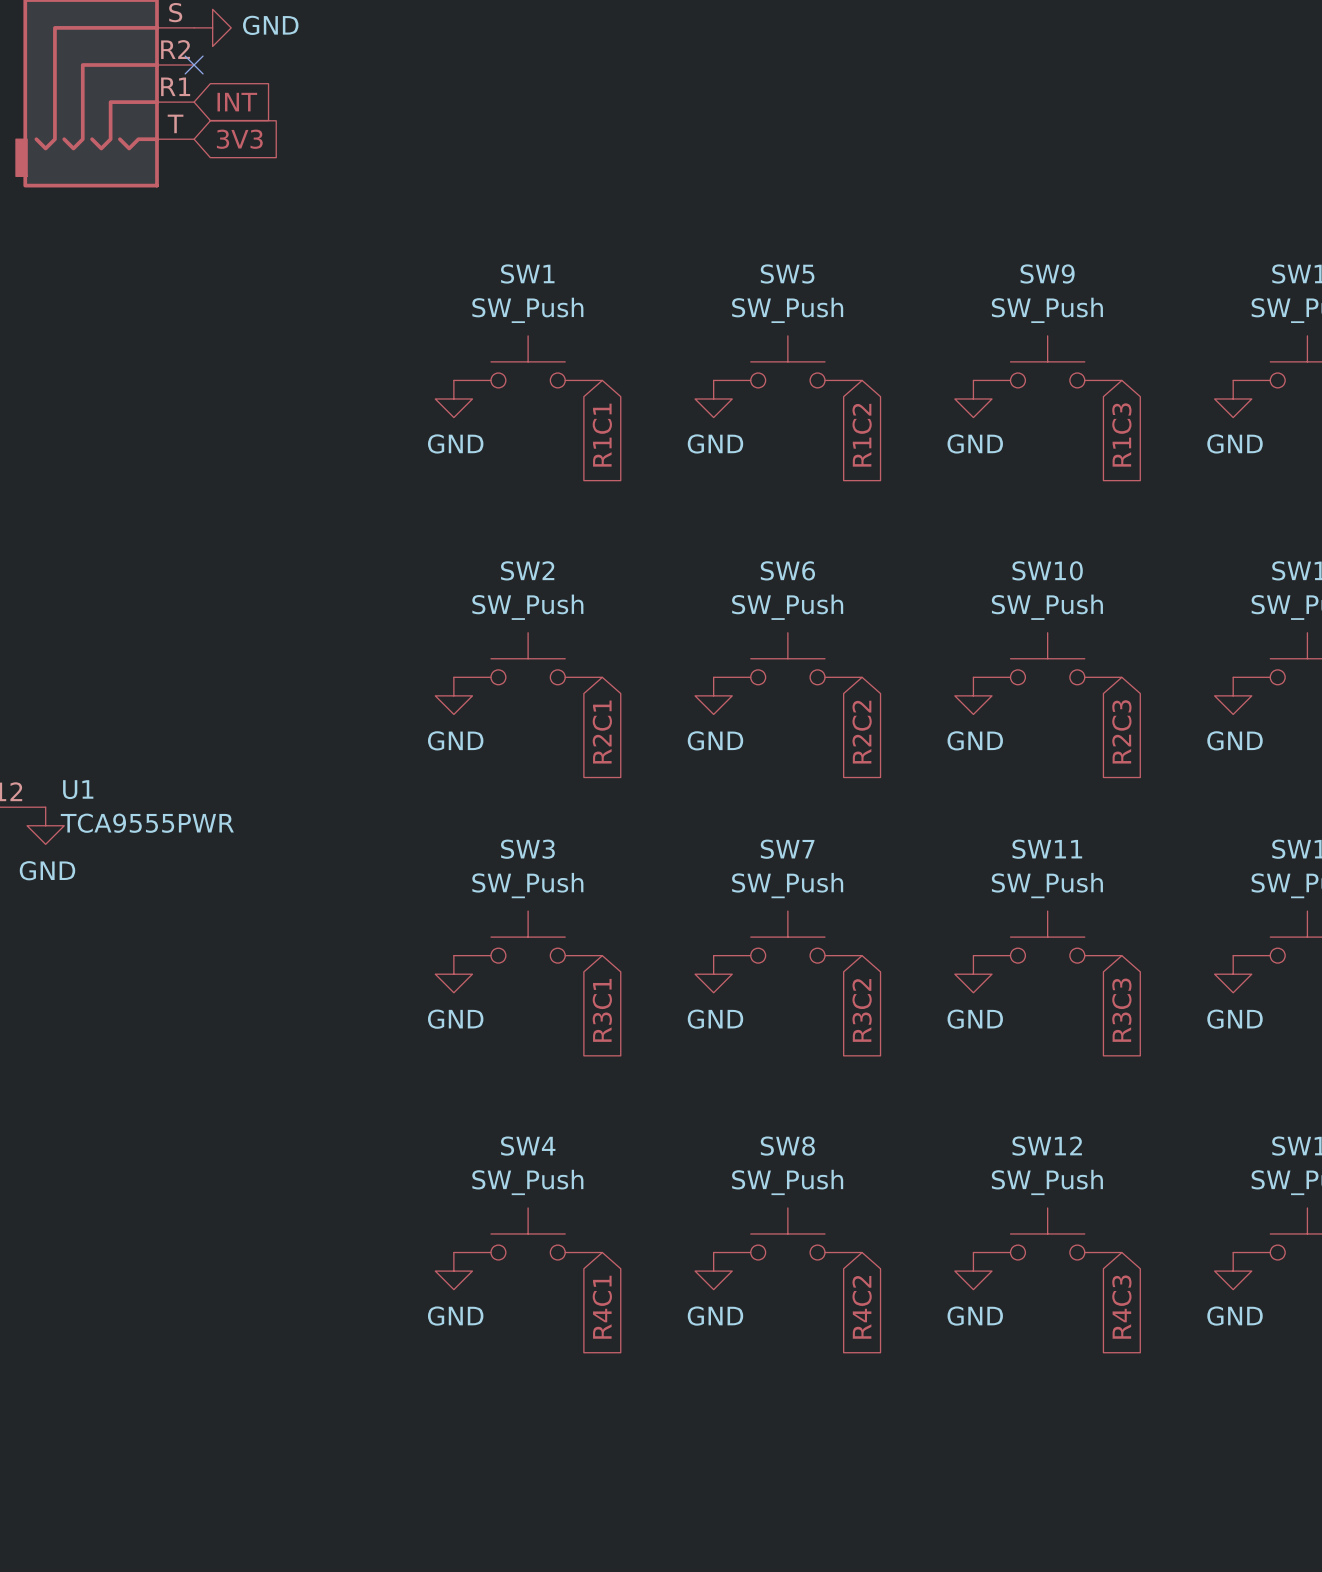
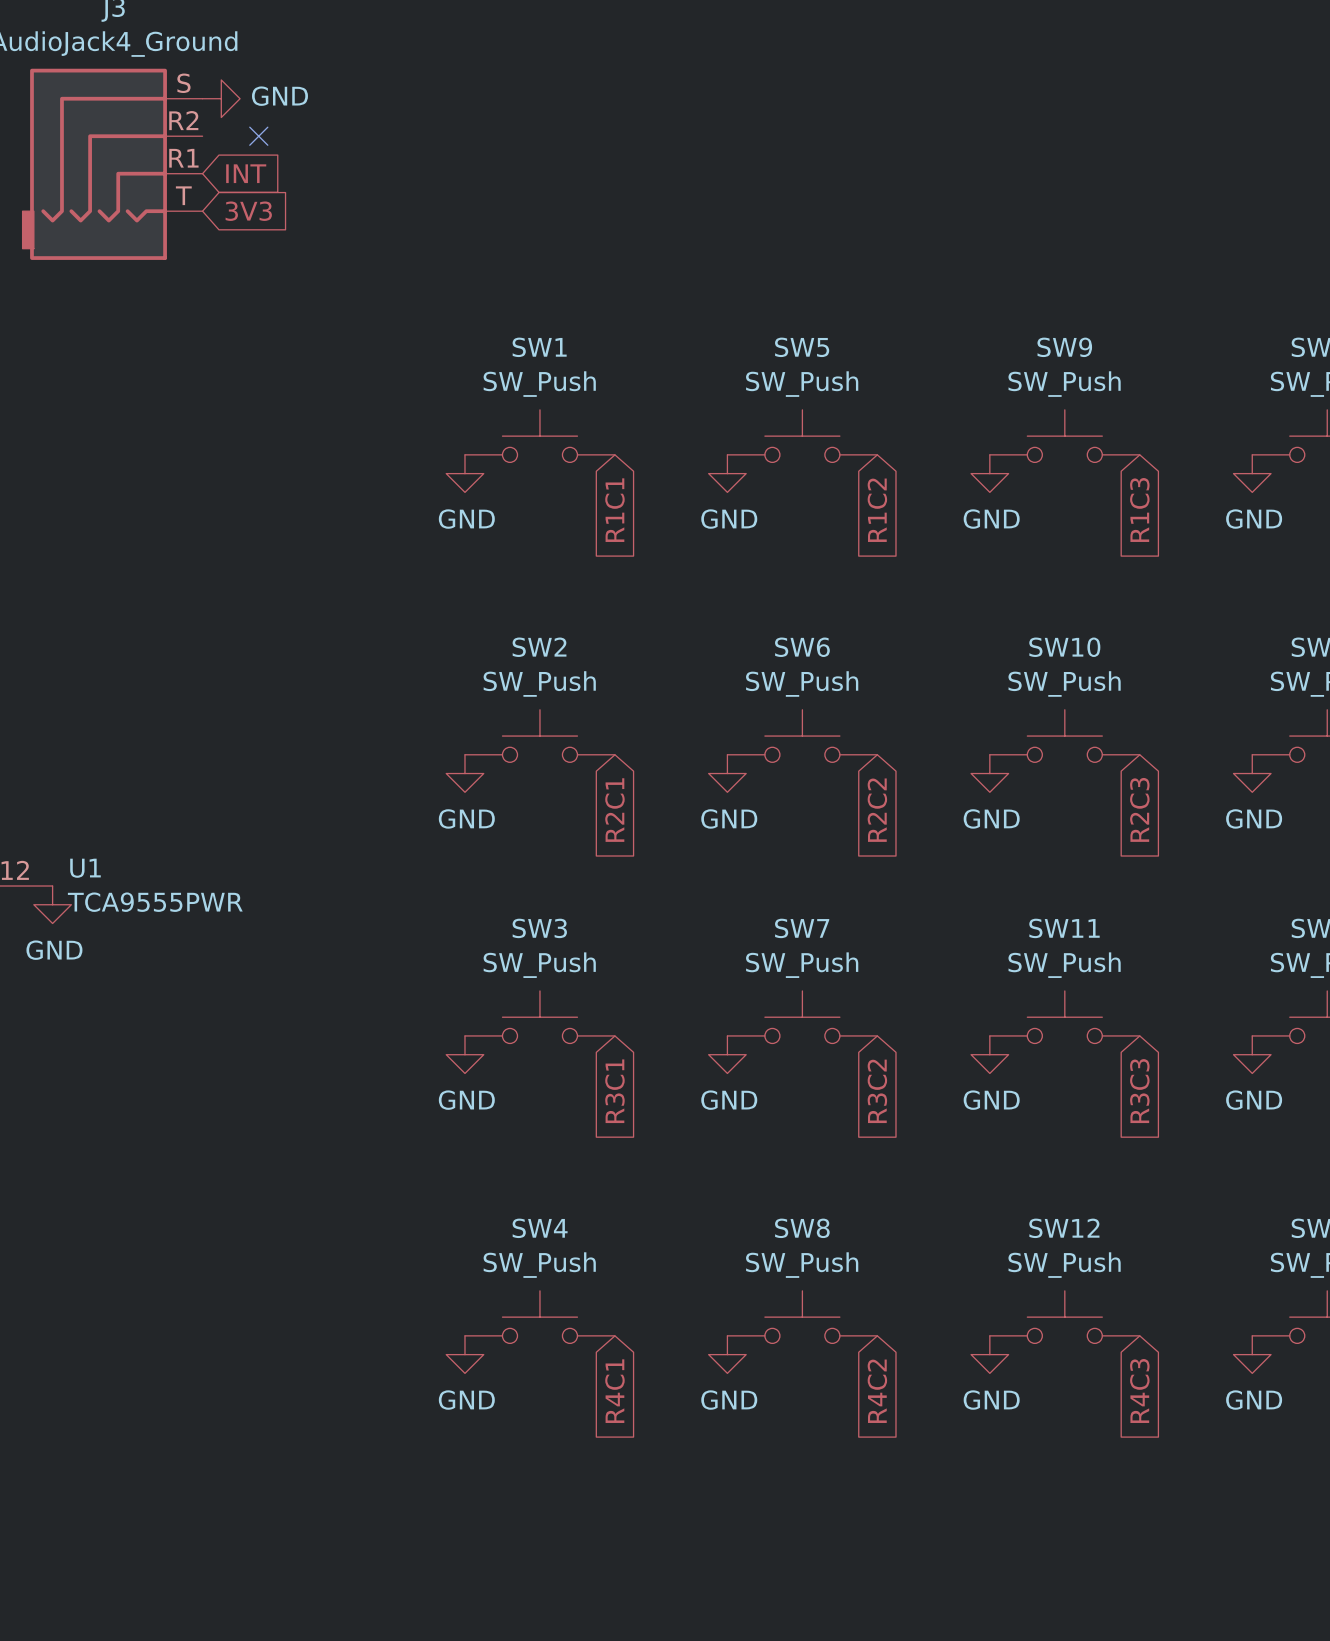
no-connect mark position: (194, 65) -> (258, 136)

